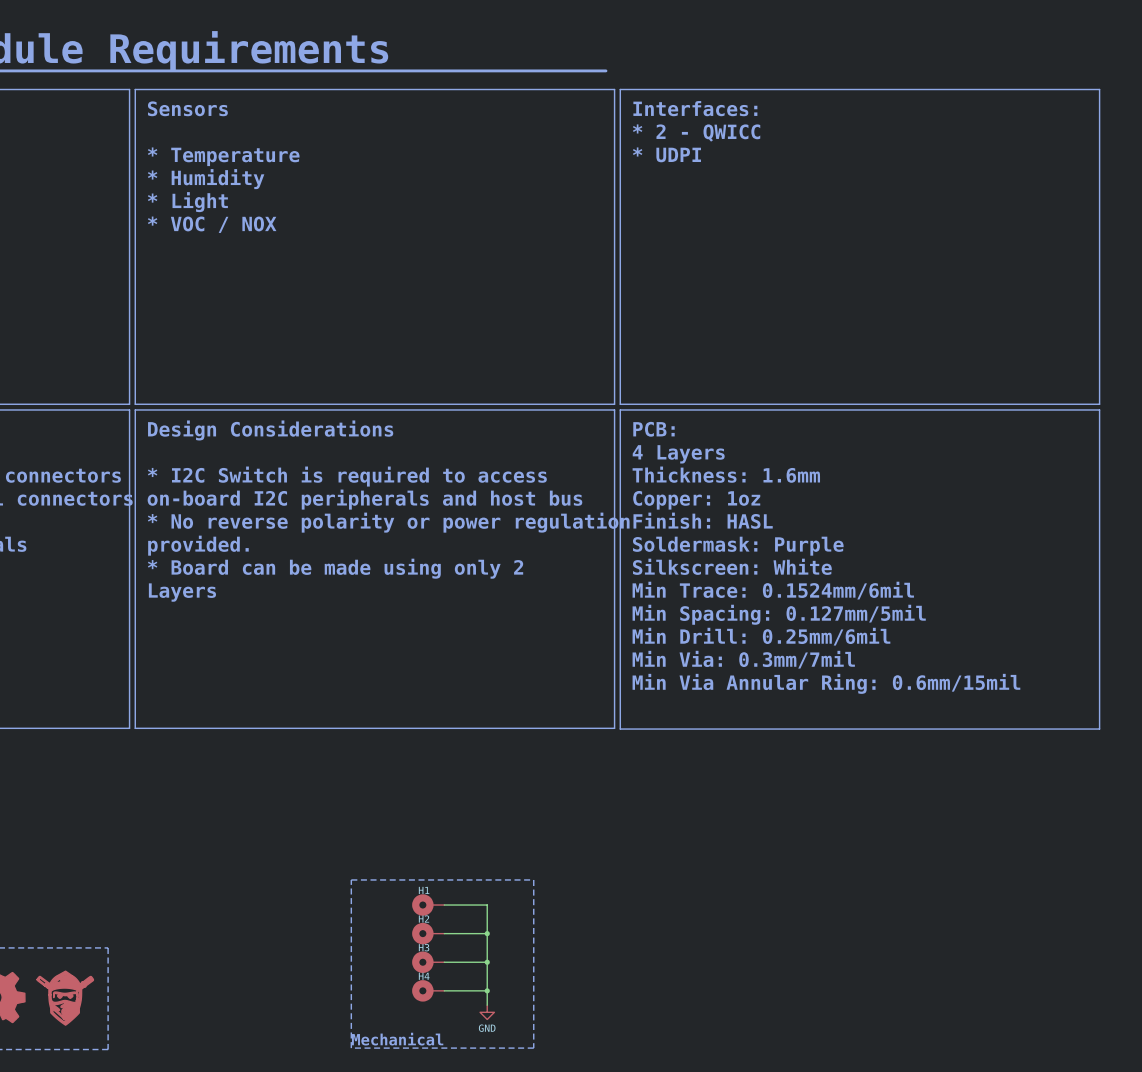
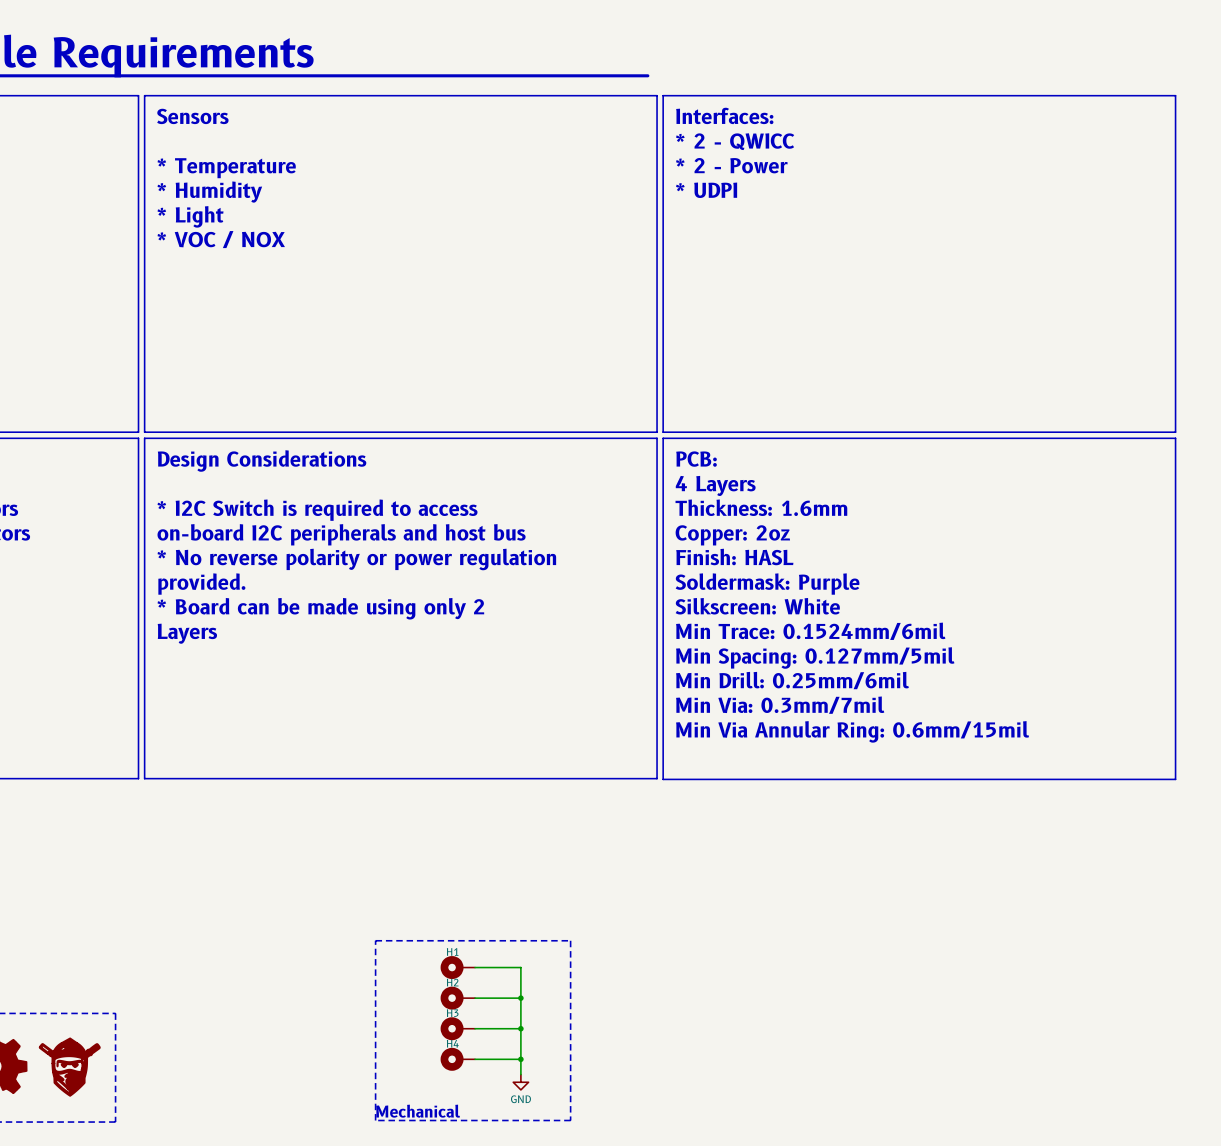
text: * UDPI (666, 154) -> * 2 - Power (731, 165)
text: none -> * UDPI (706, 190)
text: Copper: 1oz (696, 500) -> Copper: 2oz (732, 535)

